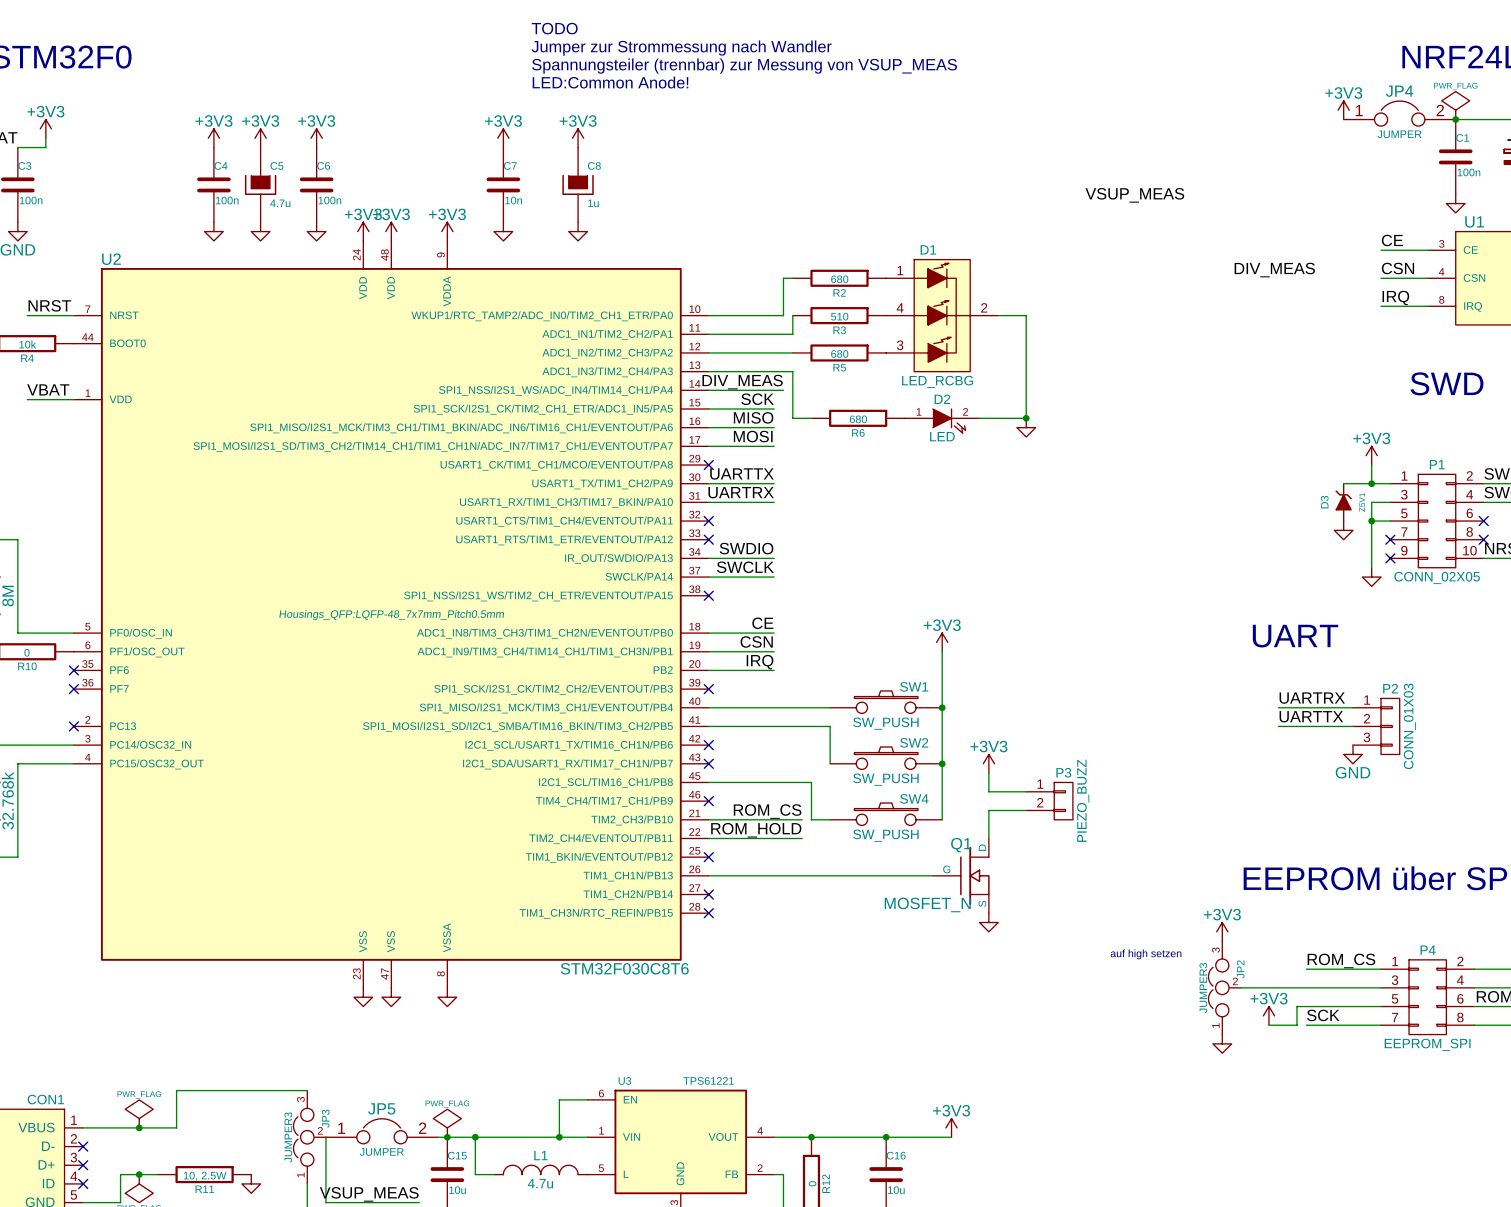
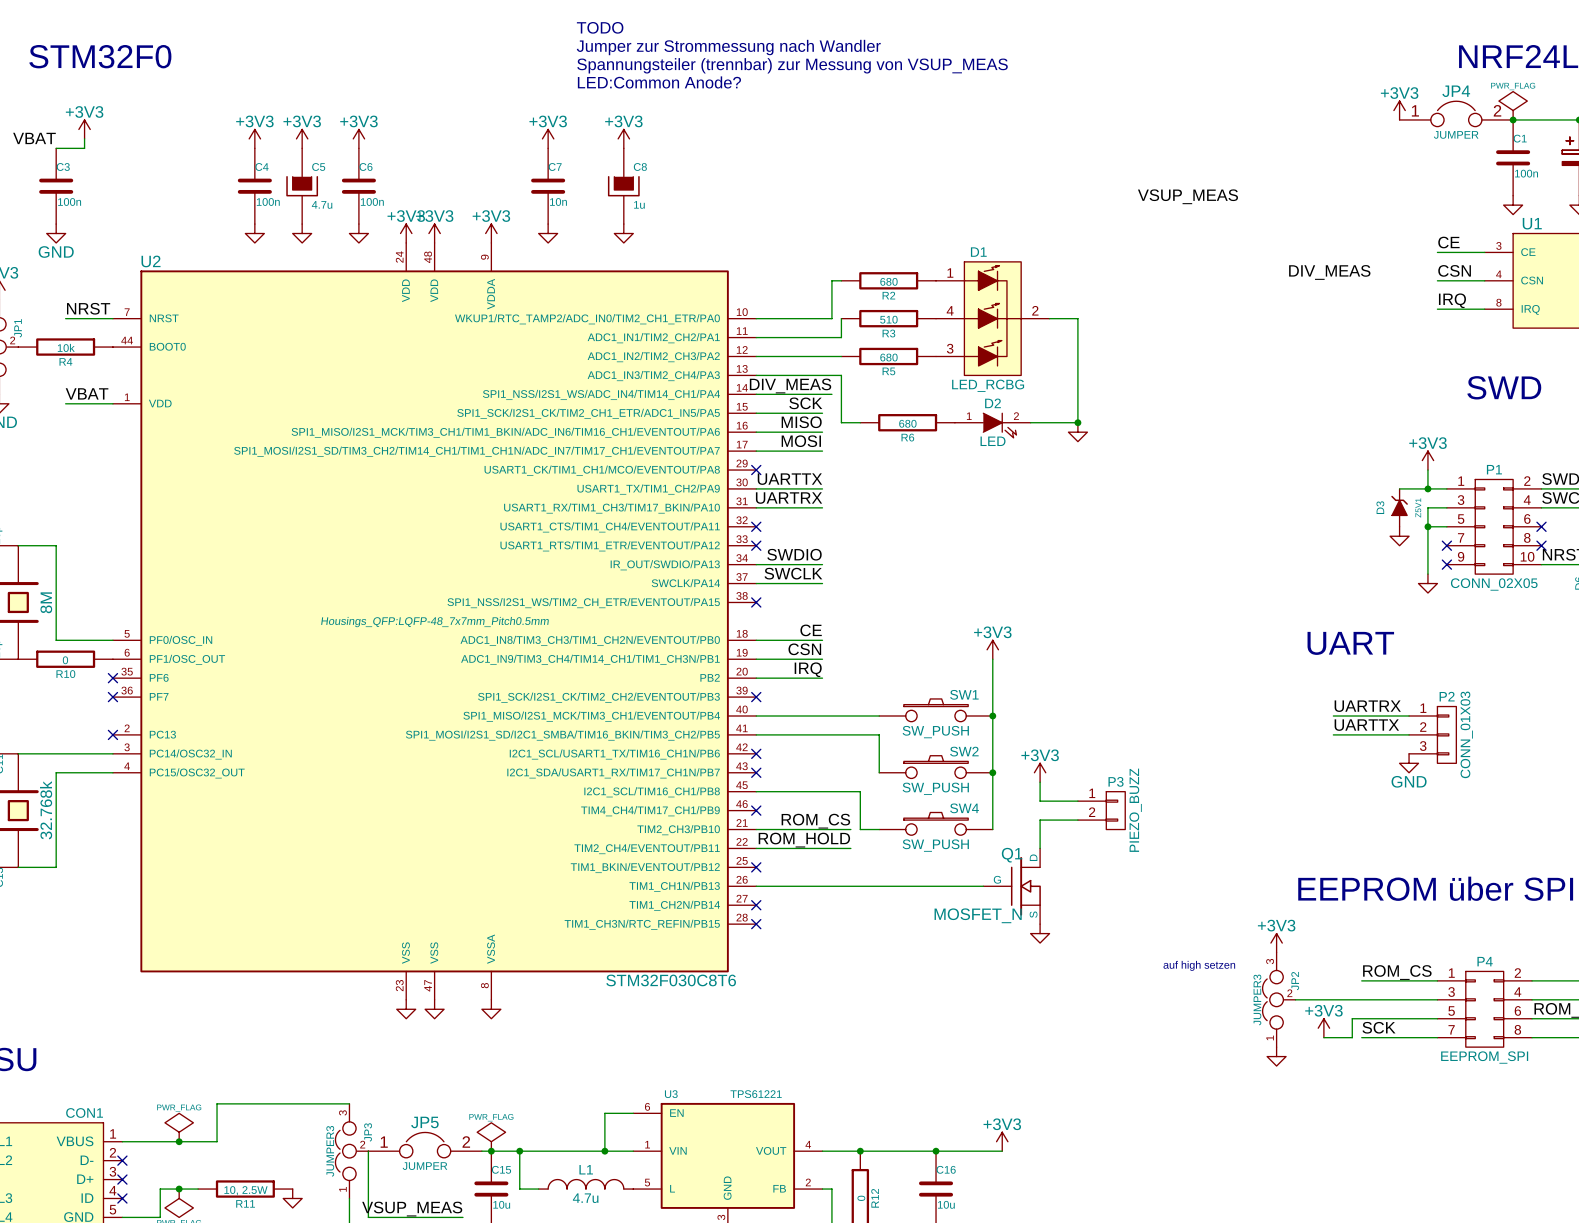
text: LED:Common Anode! (610, 82) -> LED:Common Anode? (659, 82)

